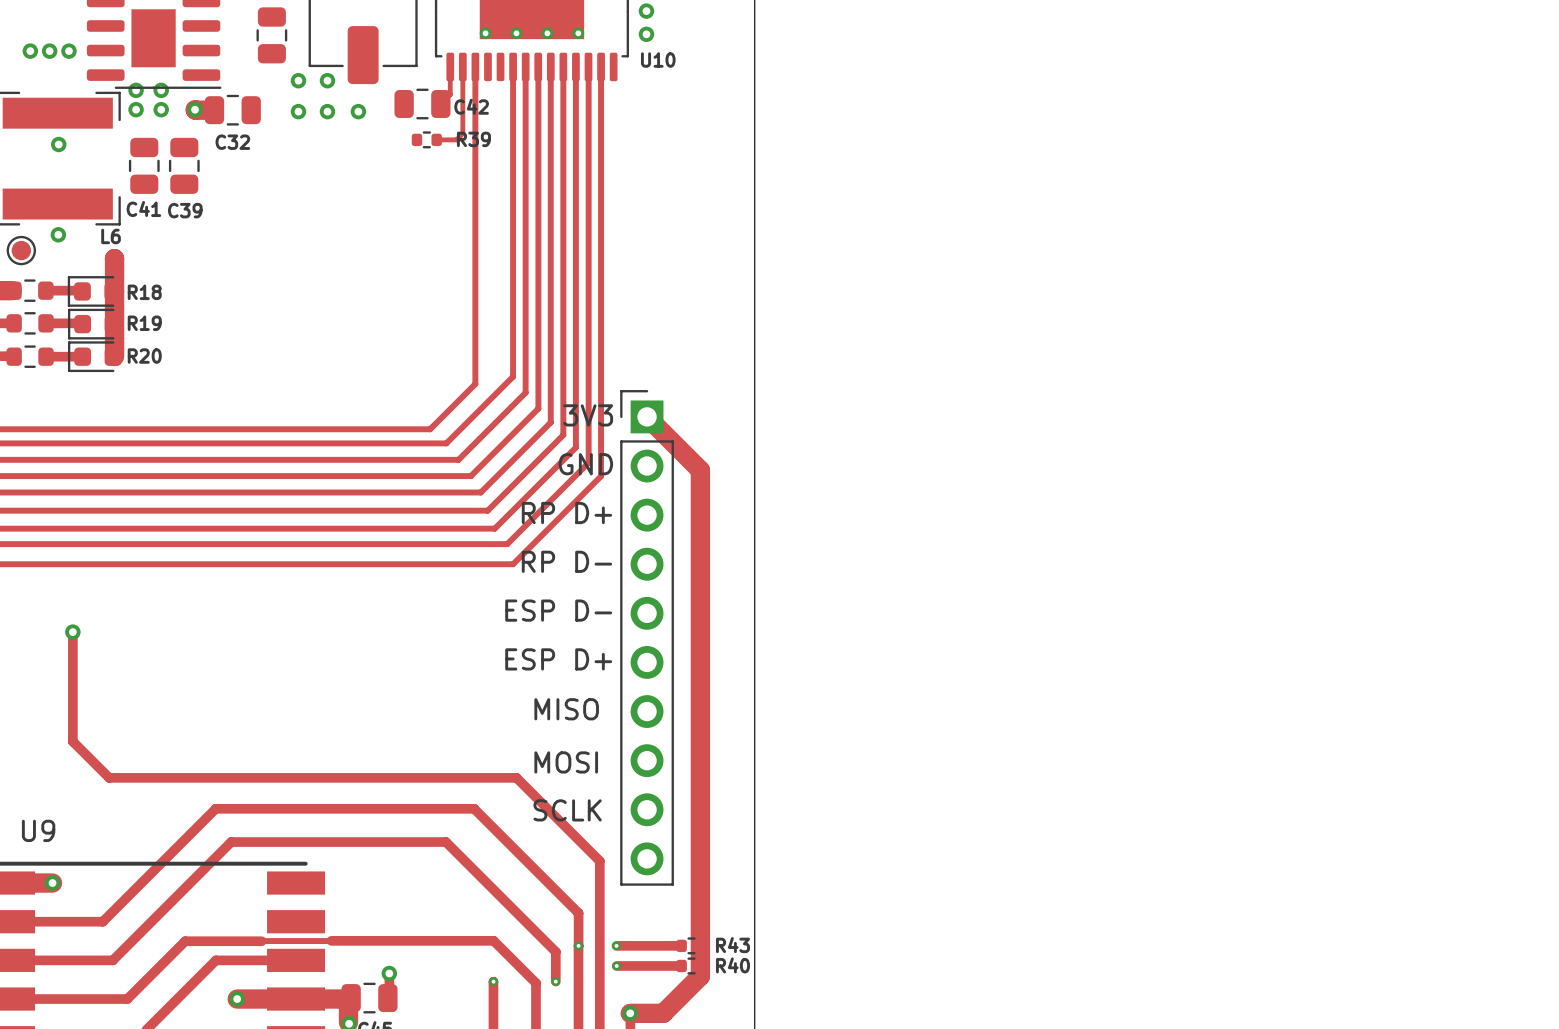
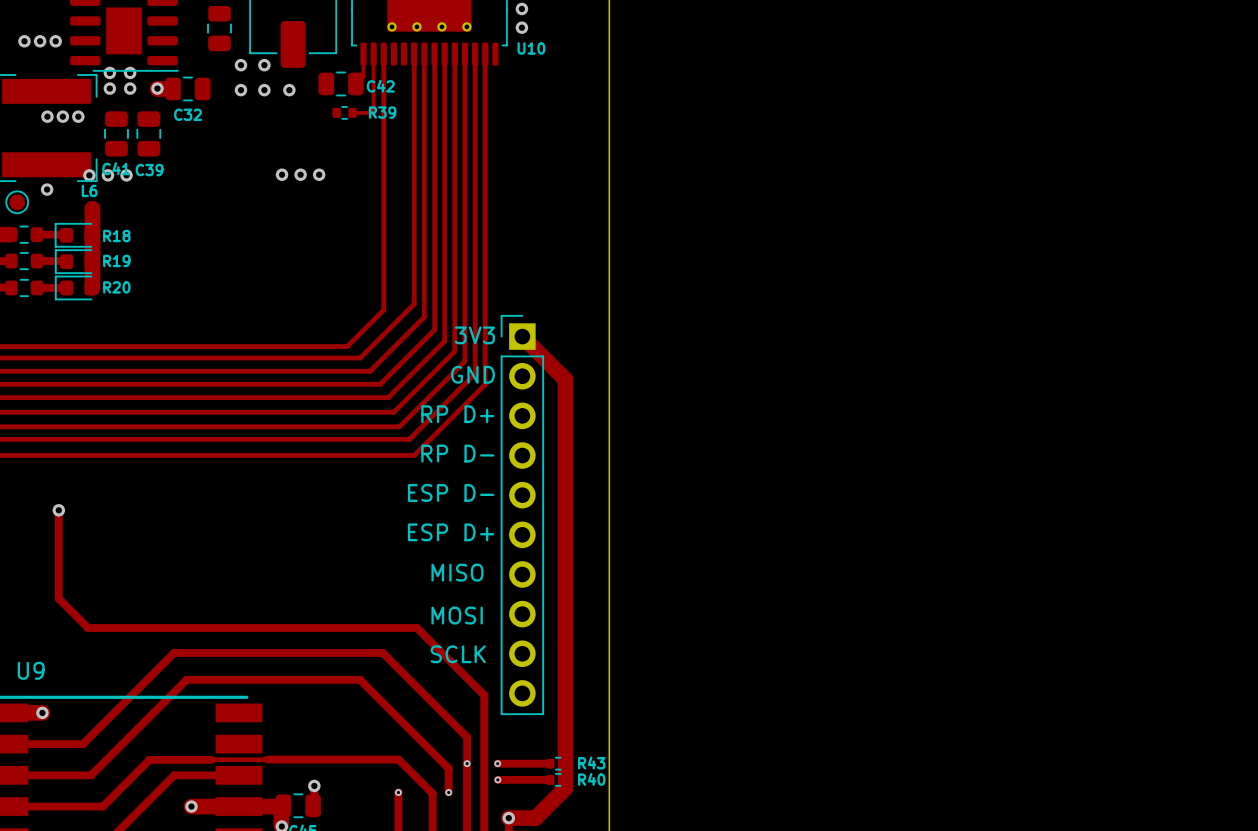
via: none -> (62, 116)
via: none -> (78, 116)
via: none -> (282, 174)
via: none -> (300, 174)
via: none -> (319, 174)
via: none -> (89, 175)
via: none -> (107, 175)
via: none -> (126, 175)

